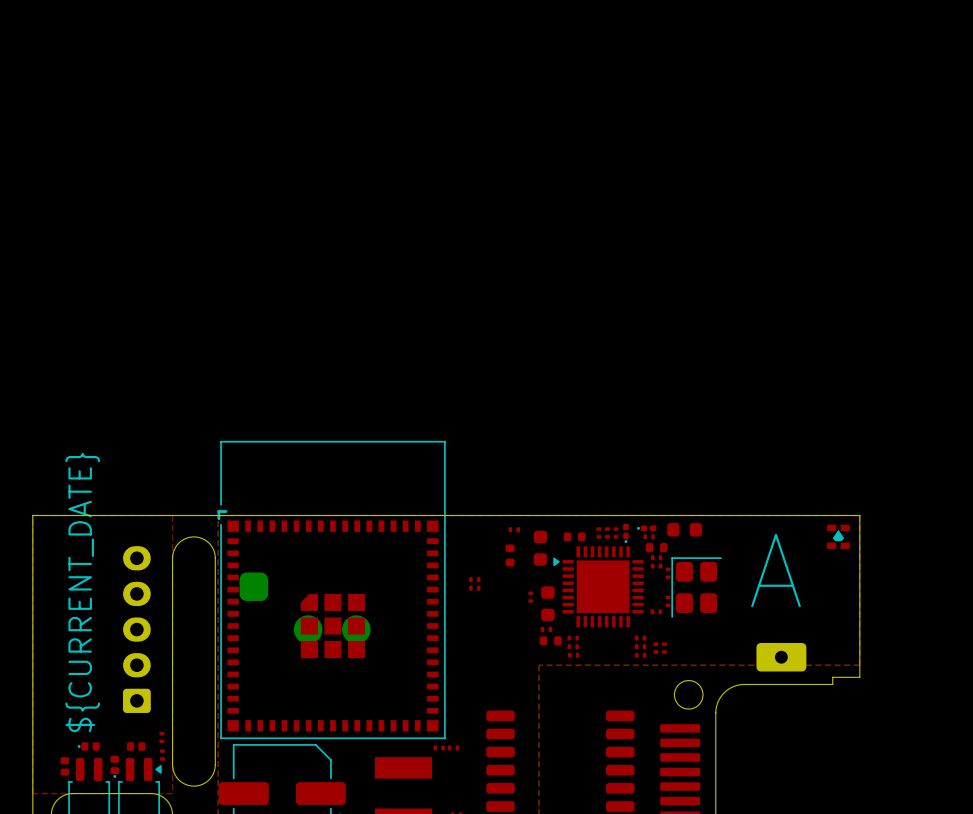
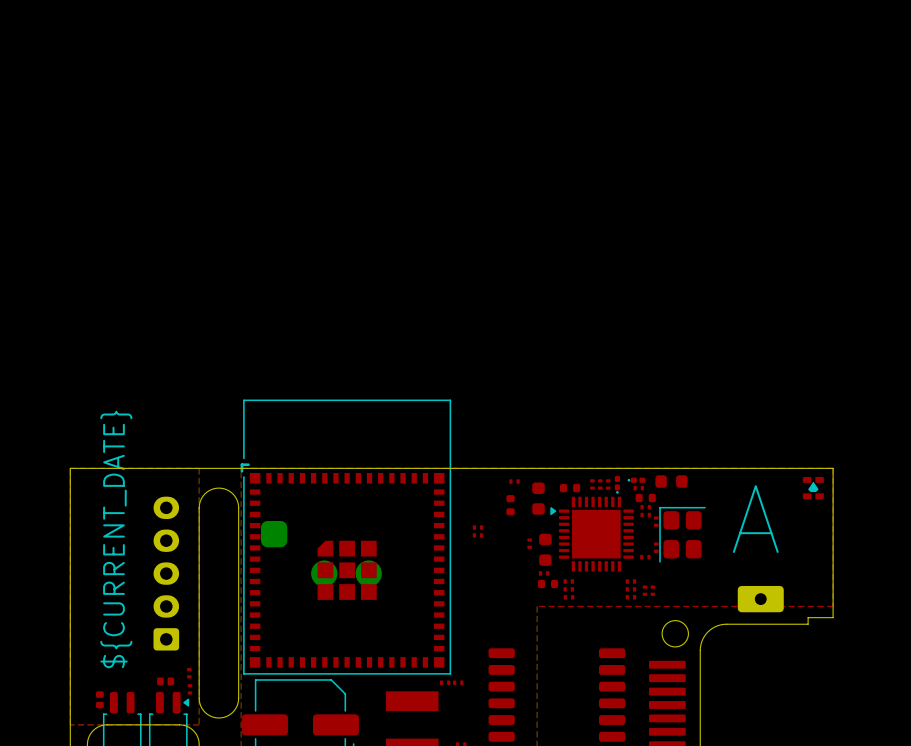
part: (88, 746) -> none
part: (114, 766) -> none

